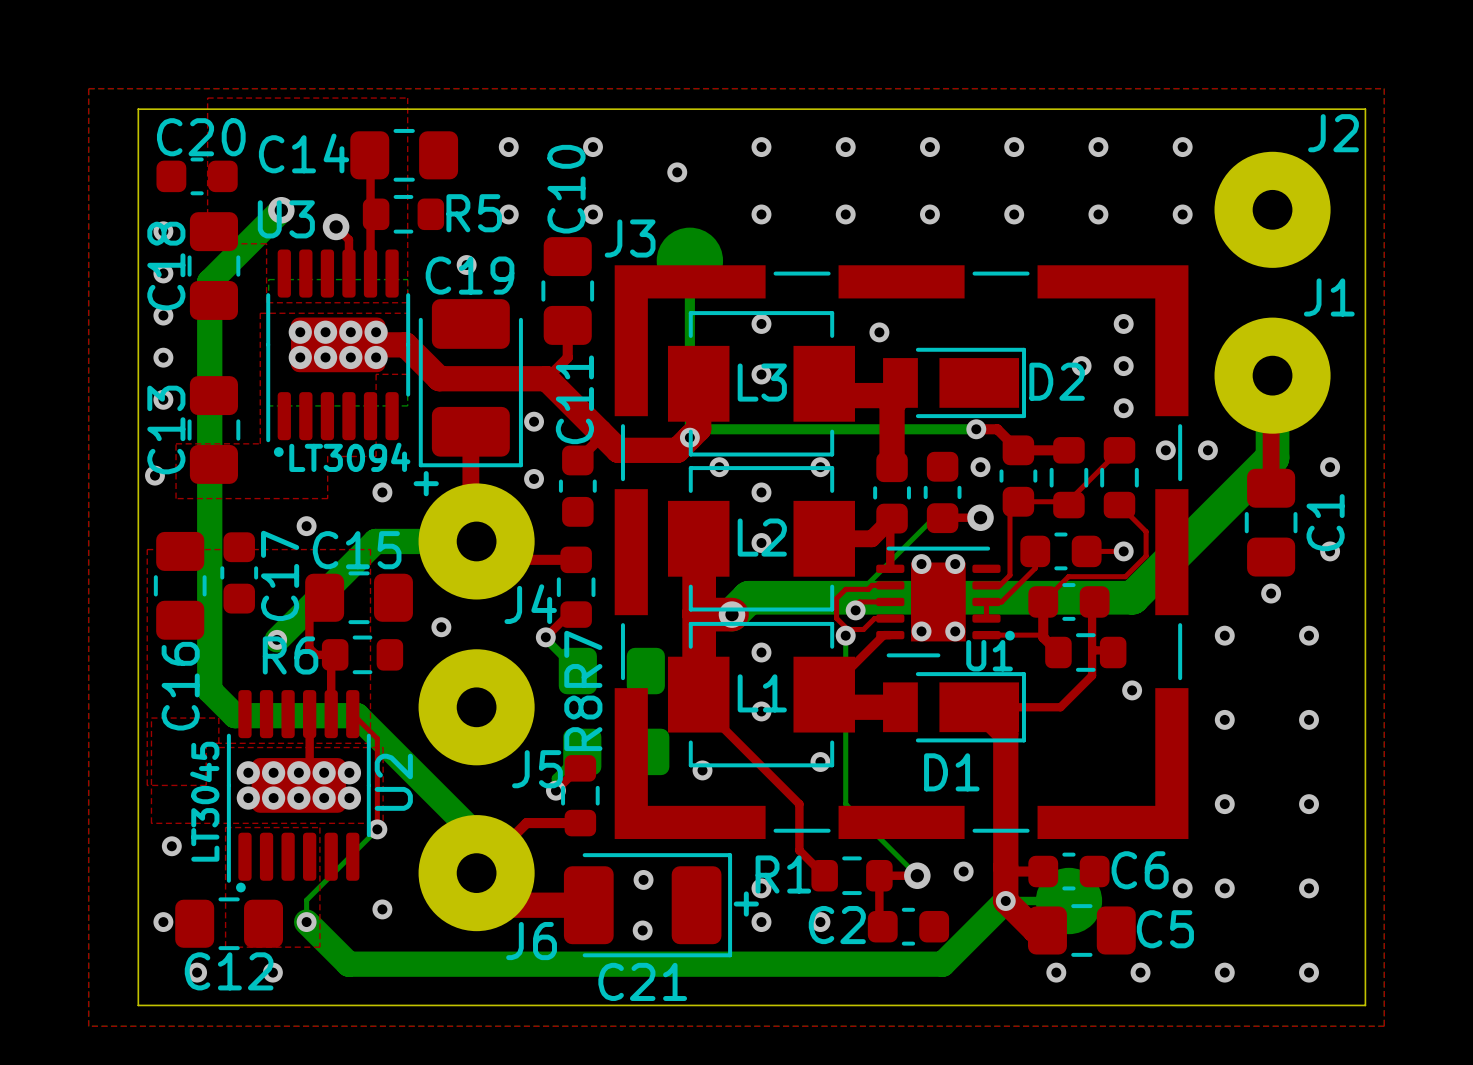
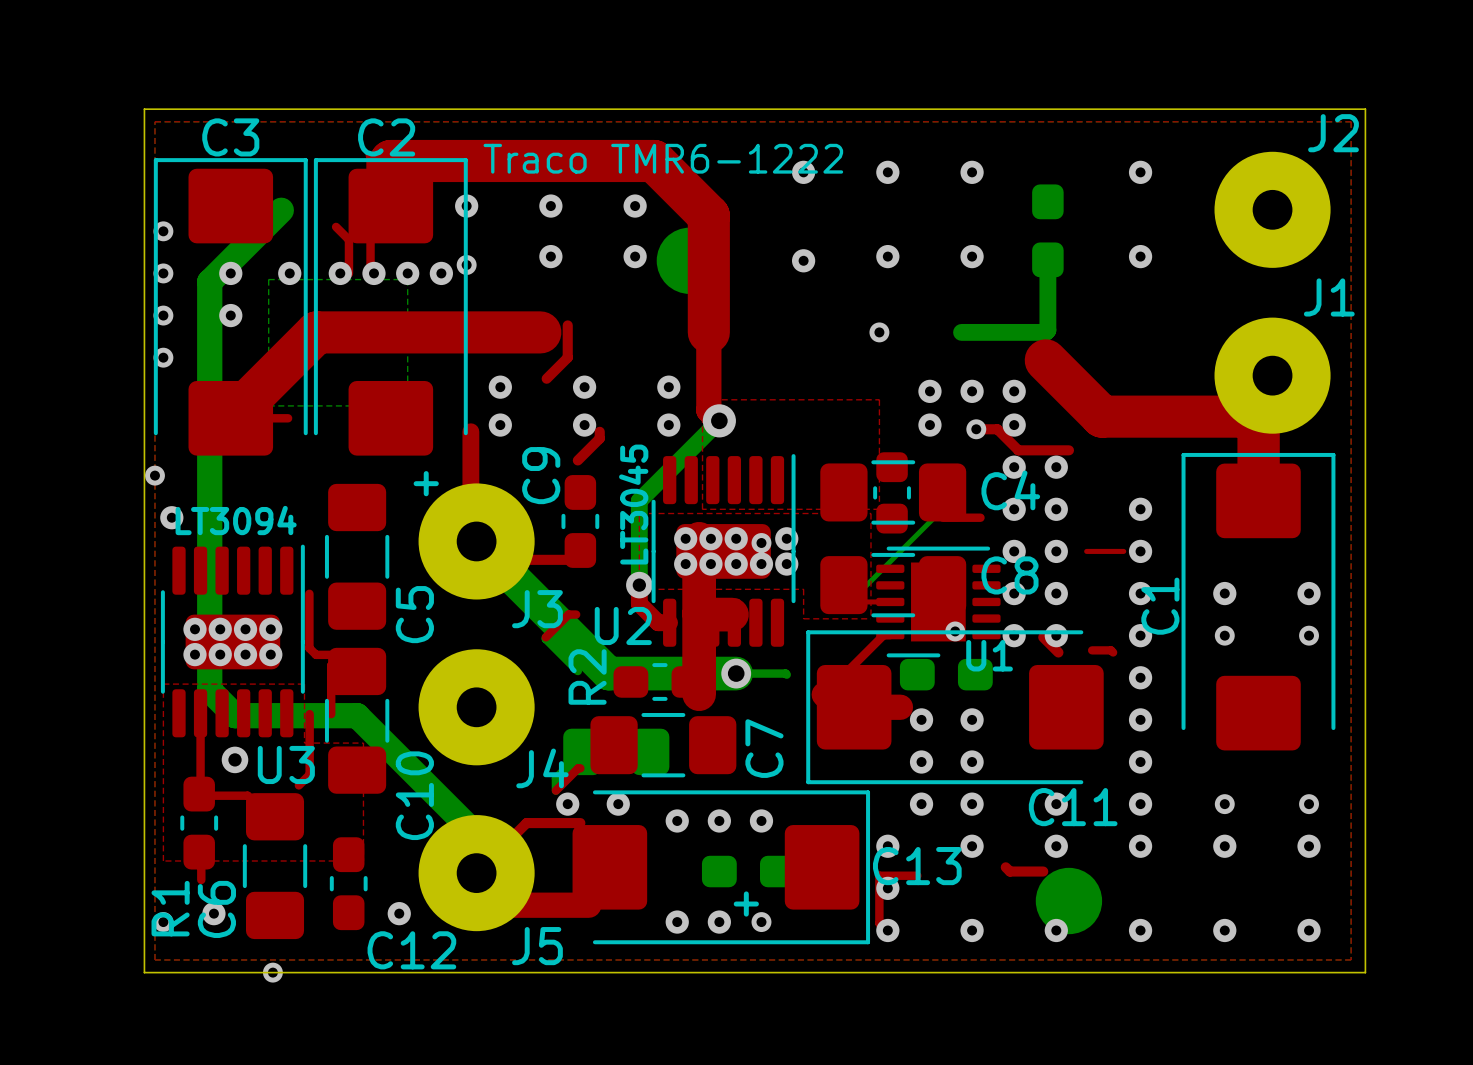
top zone outline: (88, 88) (88, 1026) (1384, 1026) (1384, 88) (88, 88) -> (154, 121) (154, 959) (1351, 959) (1351, 121) (154, 121)
top zone outline: (207, 98) (207, 243) (266, 243) (266, 302) (407, 302) (407, 98) (207, 98) -> none
board edge: (144, 109) (138, 109) (138, 1005) (1365, 1005) (1365, 972) -> (144, 109) (144, 972) (1365, 972)
via: (508, 147) -> none
via: (593, 147) -> none
via: (761, 147) -> none
via: (845, 147) -> none
via: (929, 147) -> none
via: (1014, 147) -> none
via: (1098, 147) -> none
via: (1182, 147) -> none
C14: (404, 155) -> none
text: none -> Traco TMR6-1222 (663, 158)
via: (677, 172) -> none
via: none -> (803, 172)
via: none -> (887, 172)
via: none -> (972, 172)
via: none -> (1140, 172)
C20: (197, 176) -> none
C10 name position: C10 (566, 189) -> C10 (414, 795)
top track: none -> (390, 206) (390, 160) (654, 160) (708, 215) (708, 410) (719, 420)
via: none -> (466, 206)
via: none -> (550, 206)
via: none -> (635, 206)
via: (281, 210) -> none
R5: (403, 214) -> none
via: (508, 214) -> none
via: (593, 214) -> none
via: (761, 214) -> none
via: (845, 214) -> none
via: (929, 214) -> none
via: (1014, 214) -> none
via: (1098, 214) -> none
via: (1182, 214) -> none
via: (336, 226) -> none
part: none -> (1047, 230)
C10 footprint: [541, 237, 595, 345] -> [324, 647, 390, 794]
via: none -> (550, 256)
via: none -> (635, 256)
via: none -> (887, 256)
via: none -> (972, 256)
via: none -> (1140, 256)
bottom track: none -> (1047, 259) (1047, 330) (1045, 332) (961, 332)
bottom track: (689, 260) (689, 437) (698, 429) (976, 429) -> none
via: none -> (803, 260)
C18: (213, 266) -> none
via: none -> (230, 273)
via: none -> (289, 273)
via: none -> (340, 273)
via: none -> (373, 273)
via: none -> (407, 273)
via: none -> (441, 273)
C3: none -> (230, 306)
top zone outline: (260, 313) (260, 443) (176, 443) (176, 498) (327, 498) (327, 456) (376, 456) (376, 374) (407, 374) (407, 313) (260, 313) -> none
via: none -> (230, 315)
via: (761, 323) -> none
via: (1123, 323) -> none
via: (300, 332) -> none
via: (325, 332) -> none
via: (350, 332) -> none
via: (376, 332) -> none
top track: none -> (540, 332) (316, 332) (230, 418) (288, 418)
top track: (338, 344) (405, 344) (439, 378) (546, 378) (618, 450) (677, 450) (698, 428) (698, 382) -> none
U3 rotation: 0° (338, 345) -> 180° (232, 640)
U3 position: (338, 345) -> (232, 640)
via: (300, 357) -> none
via: (325, 357) -> none
via: (350, 357) -> none
via: (376, 357) -> none
top track: none -> (1045, 360) (1102, 416) (1241, 416) (1272, 385) (1272, 375) (1258, 389) (1258, 500)
via: (1081, 366) -> none
via: (1123, 366) -> none
via: (761, 374) -> none
bottom track: (1272, 375) (1272, 457) (1132, 597) (748, 597) (732, 614) -> none
C13 footprint: [187, 376, 241, 484] -> [572, 790, 871, 945]
D2: (954, 382) -> none
C19: (470, 383) -> none
L3: (761, 383) -> none
top track: (824, 383) (836, 395) (900, 395) (892, 404) (892, 467) -> none
via: none -> (500, 387)
via: none -> (584, 387)
via: none -> (668, 387)
via: none -> (929, 391)
via: none -> (972, 391)
via: none -> (1014, 391)
via: (163, 399) -> none
C11 name position: C11 (574, 399) -> C11 (1073, 807)
top zone outline: none -> (702, 399) (702, 509) (879, 509) (879, 399) (702, 399)
via: (1123, 408) -> none
bottom track: none -> (719, 420) (639, 500) (639, 585)
via: none -> (719, 420)
via: (534, 421) -> none
via: none -> (500, 425)
via: none -> (584, 425)
via: none -> (929, 425)
via: none -> (1014, 425)
C13 name position: C13 (166, 429) -> C13 (917, 866)
via position: (689, 437) -> (668, 425)
C11 footprint: [558, 445, 597, 527] -> [806, 630, 1104, 785]
drawing: [273, 447, 284, 457] -> none
top track: (1119, 450) (1068, 500) (1068, 505) (1065, 501) (1018, 501) (1009, 510) (1009, 575) (999, 585) (986, 585) -> none
via: (1165, 450) -> none
via: (1207, 450) -> none
text position: LT3094 (349, 457) -> LT3094 (236, 520)
via: (719, 467) -> none
via: (820, 467) -> none
via: (980, 467) -> none
via: none -> (1014, 467)
via: none -> (1056, 467)
via: (1330, 467) -> none
C1 footprint: [1244, 468, 1298, 577] -> [1181, 452, 1336, 751]
part: (1018, 476) -> none
part: (1068, 477) -> none
part: (1119, 477) -> none
via: (534, 478) -> none
via: (382, 492) -> none
via: (761, 492) -> none
C4: none -> (893, 492)
part: (942, 492) -> none
top track: (1119, 505) (1146, 531) (1146, 556) (1125, 576) (1068, 576) (1043, 601) (1043, 637) (1041, 635) (986, 635) -> none
via: none -> (1014, 509)
via: none -> (1056, 509)
via: none -> (1140, 509)
top zone outline: none -> (639, 513) (639, 589) (803, 589) (803, 618) (870, 618) (870, 513) (639, 513)
via: none -> (171, 517)
via: (980, 517) -> none
C9: none -> (580, 521)
C1 name position: C1 (1325, 522) -> C1 (1160, 606)
via: (306, 526) -> none
via: none -> (685, 538)
via: none -> (710, 538)
via: none -> (736, 538)
L2: (761, 538) -> none
via: none -> (786, 538)
top track: (824, 538) (871, 538) (892, 518) (890, 520) (890, 568) -> none
bottom track: (476, 541) (375, 541) (277, 639) -> (476, 541) (608, 673) (786, 674)
top zone outline: (147, 549) (147, 785) (206, 785) (206, 743) (370, 743) (370, 549) (147, 549) -> none
via: none -> (1014, 551)
top track: (1035, 551) (1035, 568) (1001, 601) (986, 601) (986, 618) -> none
via: none -> (1056, 551)
part: (1060, 551) -> none
via position: (1123, 551) -> (1140, 551)
via: (1330, 551) -> none
J3: (901, 552) -> none
via: none -> (685, 564)
via: none -> (710, 564)
via: none -> (736, 564)
via: none -> (761, 564)
via: none -> (786, 564)
via: (921, 564) -> none
via: (955, 564) -> none
C17: (239, 572) -> none
C16: (180, 585) -> none
top track: none -> (639, 585) (639, 603) (658, 622) (669, 622)
top track: (890, 585) (872, 585) (868, 589) (845, 589) (836, 598) (836, 618) (847, 629) -> none
C8: none -> (893, 585)
R7: (576, 587) -> none
via: none -> (1014, 593)
via: none -> (1056, 593)
via: none -> (1140, 593)
via: none -> (1224, 593)
via: (1271, 593) -> none
via: none -> (1309, 593)
C15: (359, 597) -> none
part: (1068, 601) -> none
top track: (1092, 603) (1092, 675) (1060, 707) (979, 707) (1005, 733) (1005, 901) (1035, 930) (1047, 930) -> none
J4 name: J4 (530, 604) -> J3 (537, 609)
via: (855, 610) -> none
via position: (732, 614) -> (639, 585)
top track: (890, 618) (874, 618) (863, 629) (847, 629) -> none
via: (441, 627) -> none
via: none -> (194, 629)
via: none -> (220, 629)
via: none -> (245, 629)
via: none -> (270, 629)
drawing: [1005, 630, 1015, 641] -> none
via: (921, 631) -> none
bottom track: (845, 635) (845, 804) (917, 875) -> none
via: (845, 635) -> none
via: none -> (1014, 635)
via: none -> (1056, 635)
via: none -> (1140, 635)
via: (545, 637) -> none
via: (277, 639) -> none
via: (761, 652) -> none
part: (1085, 652) -> none
via: none -> (194, 654)
via: none -> (220, 654)
via: none -> (245, 654)
via: none -> (270, 654)
R6: (362, 654) -> none
part: (611, 671) -> none
via: none -> (736, 673)
part: none -> (946, 674)
R2: none -> (659, 681)
via position: (1132, 690) -> (1140, 677)
top track: (698, 694) (698, 703) (799, 804) (799, 850) (824, 875) -> none
L1: (761, 694) -> none
D1: (954, 707) -> none
via: (761, 711) -> none
top track: none -> (200, 713) (199, 794) (200, 795) (247, 795) (268, 816) (275, 816)
top track: (352, 714) (377, 738) (377, 829) -> none
top zone outline: (151, 718) (218, 718) (218, 747) (383, 747) (383, 823) (151, 823) (151, 718) -> (163, 684) (163, 860) (363, 860) (363, 743) (304, 743) (304, 684) (163, 684)
via: none -> (921, 719)
via: none -> (972, 719)
via: none -> (1140, 719)
via: (1224, 719) -> none
via: (1309, 719) -> none
C7: none -> (663, 745)
via: (820, 762) -> none
via: none -> (921, 762)
via: none -> (972, 762)
via: none -> (1140, 762)
J5 name: J5 (537, 769) -> J4 (542, 768)
via: (702, 770) -> none
via position: (248, 772) -> (235, 759)
via: (273, 772) -> none
via: (298, 772) -> none
via: (324, 772) -> none
via: (349, 772) -> none
U2 name position: U2 (393, 782) -> U2 (623, 625)
U2 rotation: 0° (298, 786) -> 180° (723, 550)
U2 position: (298, 786) -> (723, 550)
via position: (555, 790) -> (567, 804)
R8: (580, 795) -> none
via: (248, 798) -> none
via: (273, 798) -> none
via: (298, 798) -> none
via: (324, 798) -> none
via: (349, 798) -> none
text position: LT3045 (204, 801) -> LT3045 (633, 504)
via: none -> (618, 804)
via: none -> (921, 804)
via: none -> (972, 804)
via: none -> (1056, 804)
via: none -> (1140, 804)
via: none -> (677, 820)
via: none -> (719, 820)
via: none -> (761, 820)
top zone outline: (225, 827) (225, 947) (319, 947) (319, 827) (225, 827) -> none
bottom track: (377, 829) (306, 900) (306, 922) (348, 964) (942, 964) (1005, 901) (1068, 901) -> none
via: (377, 829) -> none
via: (171, 846) -> none
via: none -> (887, 846)
via: none -> (972, 846)
via: none -> (1056, 846)
via: none -> (1140, 846)
via: none -> (1224, 846)
via: none -> (1309, 846)
top track: none -> (199, 852) (201, 879)
C6 footprint: [1028, 852, 1110, 891] -> [242, 793, 308, 940]
R1 footprint: [811, 856, 893, 896] -> [180, 776, 219, 870]
C6 name position: C6 (1140, 870) -> C6 (216, 909)
part: none -> (748, 871)
via: (963, 871) -> none
R1 name position: R1 (783, 874) -> R1 (170, 908)
via: (917, 875) -> none
via: (643, 879) -> none
drawing: [236, 882, 246, 893] -> none
via: (761, 888) -> none
via: none -> (887, 888)
via: (1182, 888) -> none
via: (1224, 888) -> none
via: (1309, 888) -> none
C12 footprint: [175, 897, 283, 951] -> [329, 837, 368, 931]
via: (1005, 901) -> none
C5 footprint: [1027, 904, 1136, 957] -> [324, 483, 390, 630]
C21: (647, 905) -> none
C2 footprint: [867, 907, 950, 946] -> [313, 158, 468, 456]
via position: (382, 909) -> (399, 913)
via: none -> (213, 913)
via: (306, 922) -> none
via: none -> (677, 922)
via: none -> (719, 922)
via: (820, 922) -> none
C2 name position: C2 (837, 925) -> C2 (386, 137)
via: (642, 930) -> none
via: none -> (887, 930)
via: none -> (972, 930)
via: none -> (1056, 930)
via: none -> (1140, 930)
via: none -> (1224, 930)
via: none -> (1309, 930)
J6 name: J6 (531, 941) -> J5 (537, 946)
via: (197, 972) -> none
via: (1056, 972) -> none
via: (1140, 972) -> none
via: (1224, 972) -> none
via: (1309, 972) -> none

